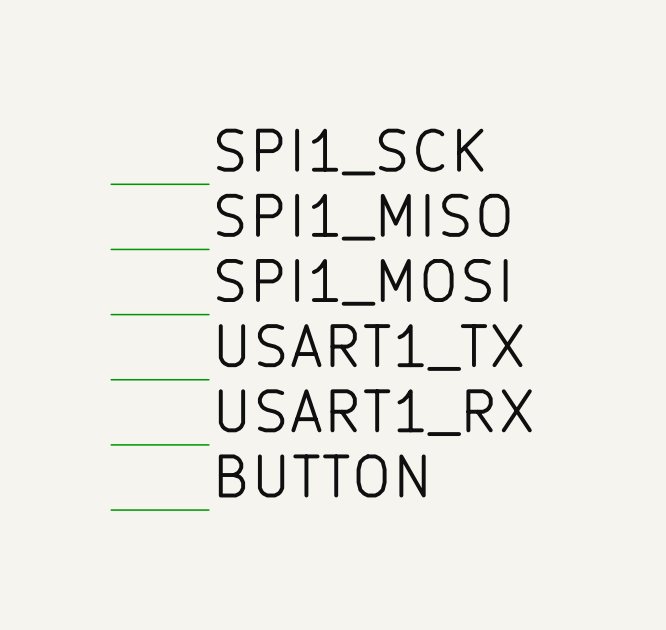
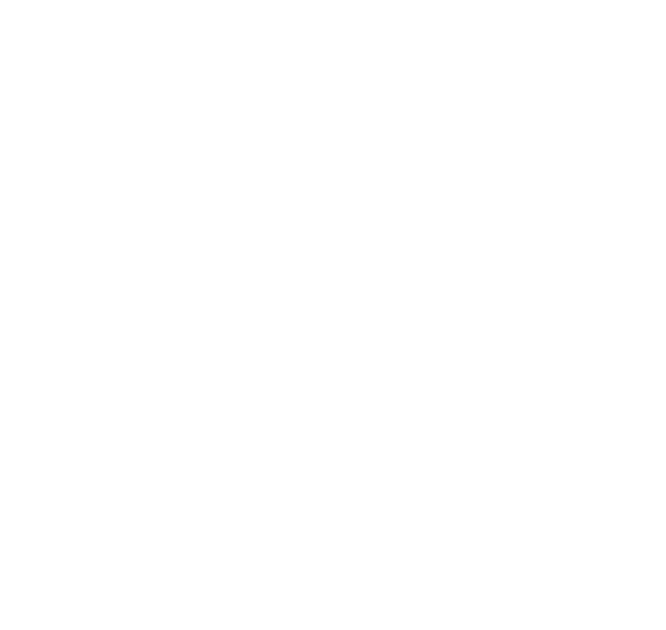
label: SPI1_SCK (350, 152) -> none
wire: (111, 184) (208, 184) -> none
label: SPI1_MISO (363, 217) -> none
wire: (111, 249) (208, 249) -> none
label: SPI1_MOSI (362, 282) -> none
wire: (111, 314) (208, 314) -> none
label: USART1_TX (370, 347) -> none
wire: (111, 379) (208, 379) -> none
label: USART1_RX (375, 412) -> none
wire: (111, 444) (208, 444) -> none
label: BUTTON (322, 475) -> none
wire: (111, 510) (208, 510) -> none

